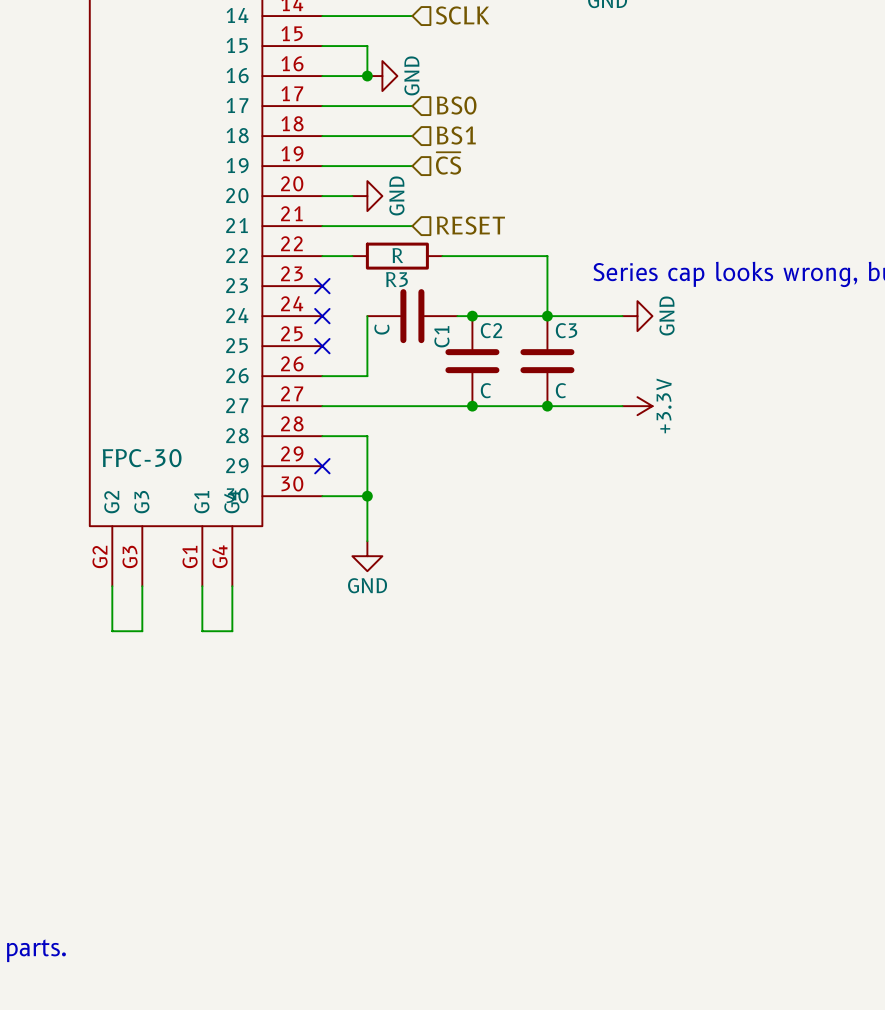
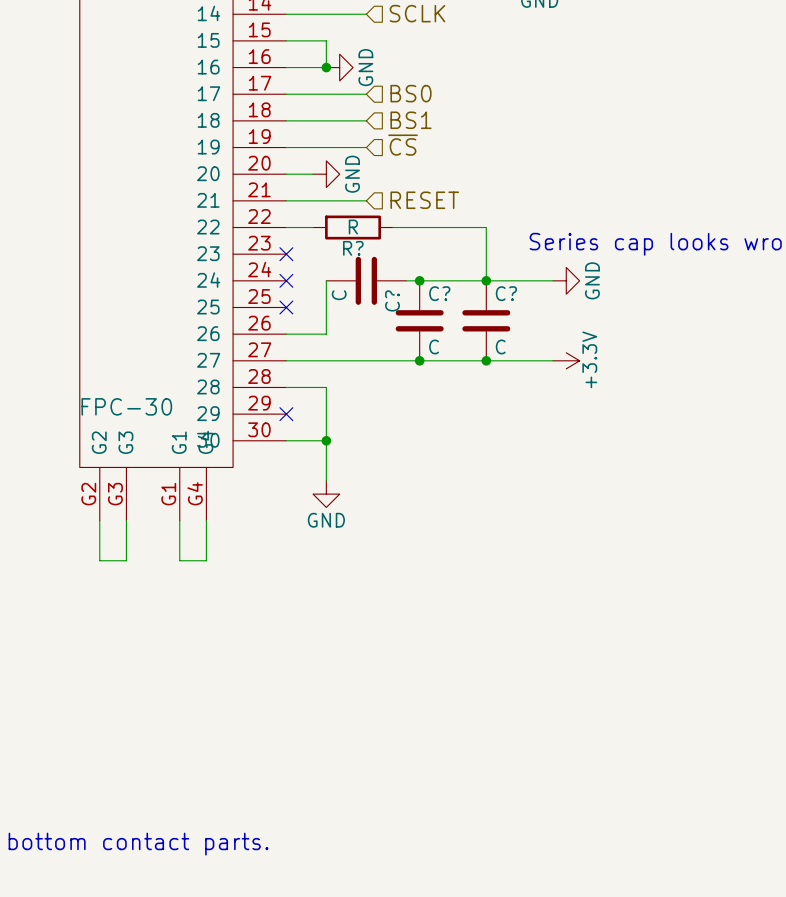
R3 name: R3 (396, 279) -> R? (353, 248)
C2 name: C2 (491, 330) -> C? (439, 293)
C3 name: C3 (566, 330) -> C? (506, 293)
C1 name: C1 (441, 336) -> C? (392, 300)

